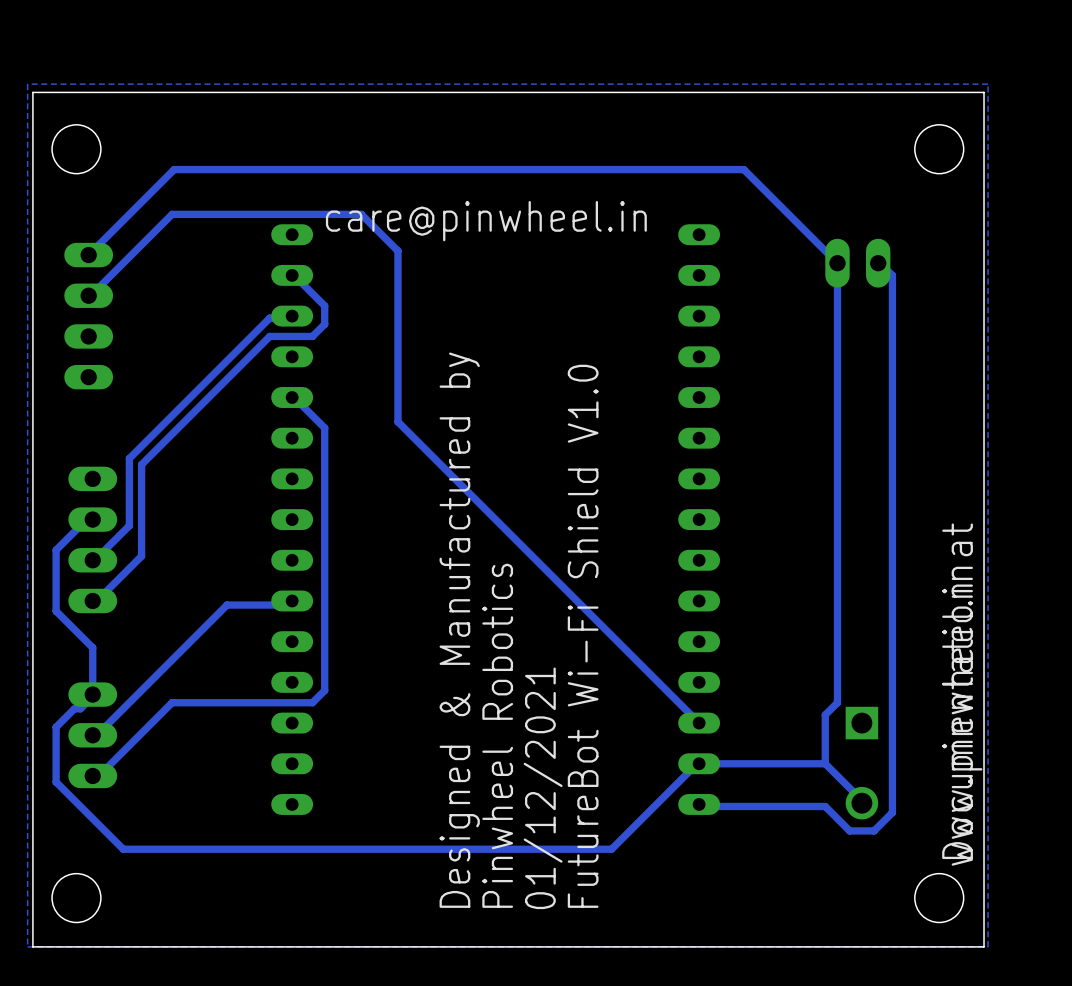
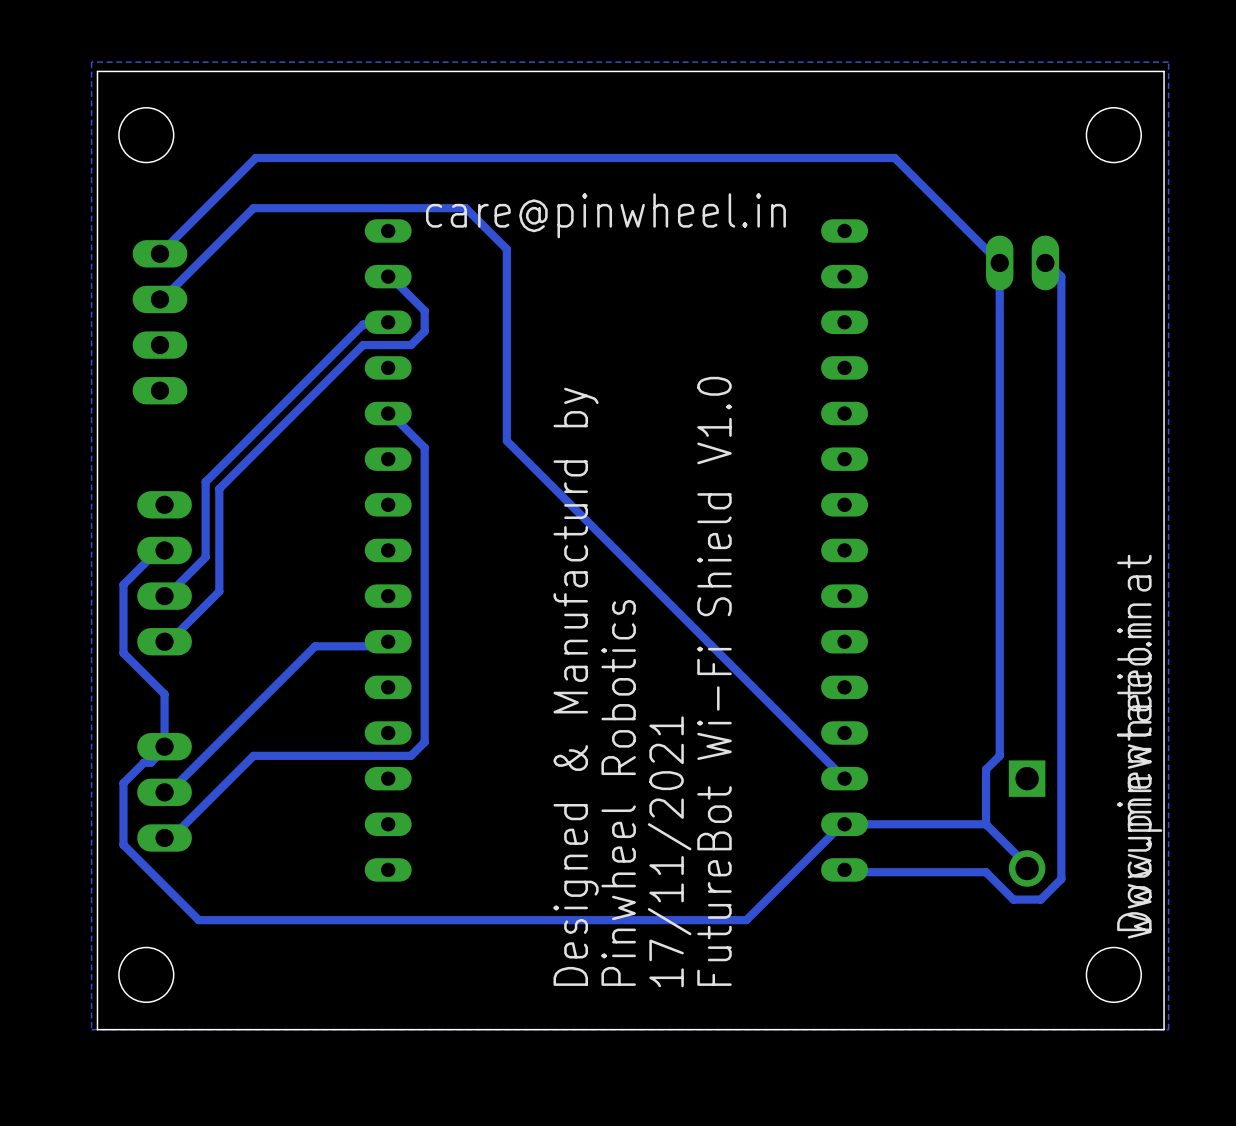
text: Designed & Manufactured by (459, 630) -> Designed & Manufacturd by (576, 686)
text: 01/12/2021 (543, 788) -> 17/11/2021 (669, 851)

